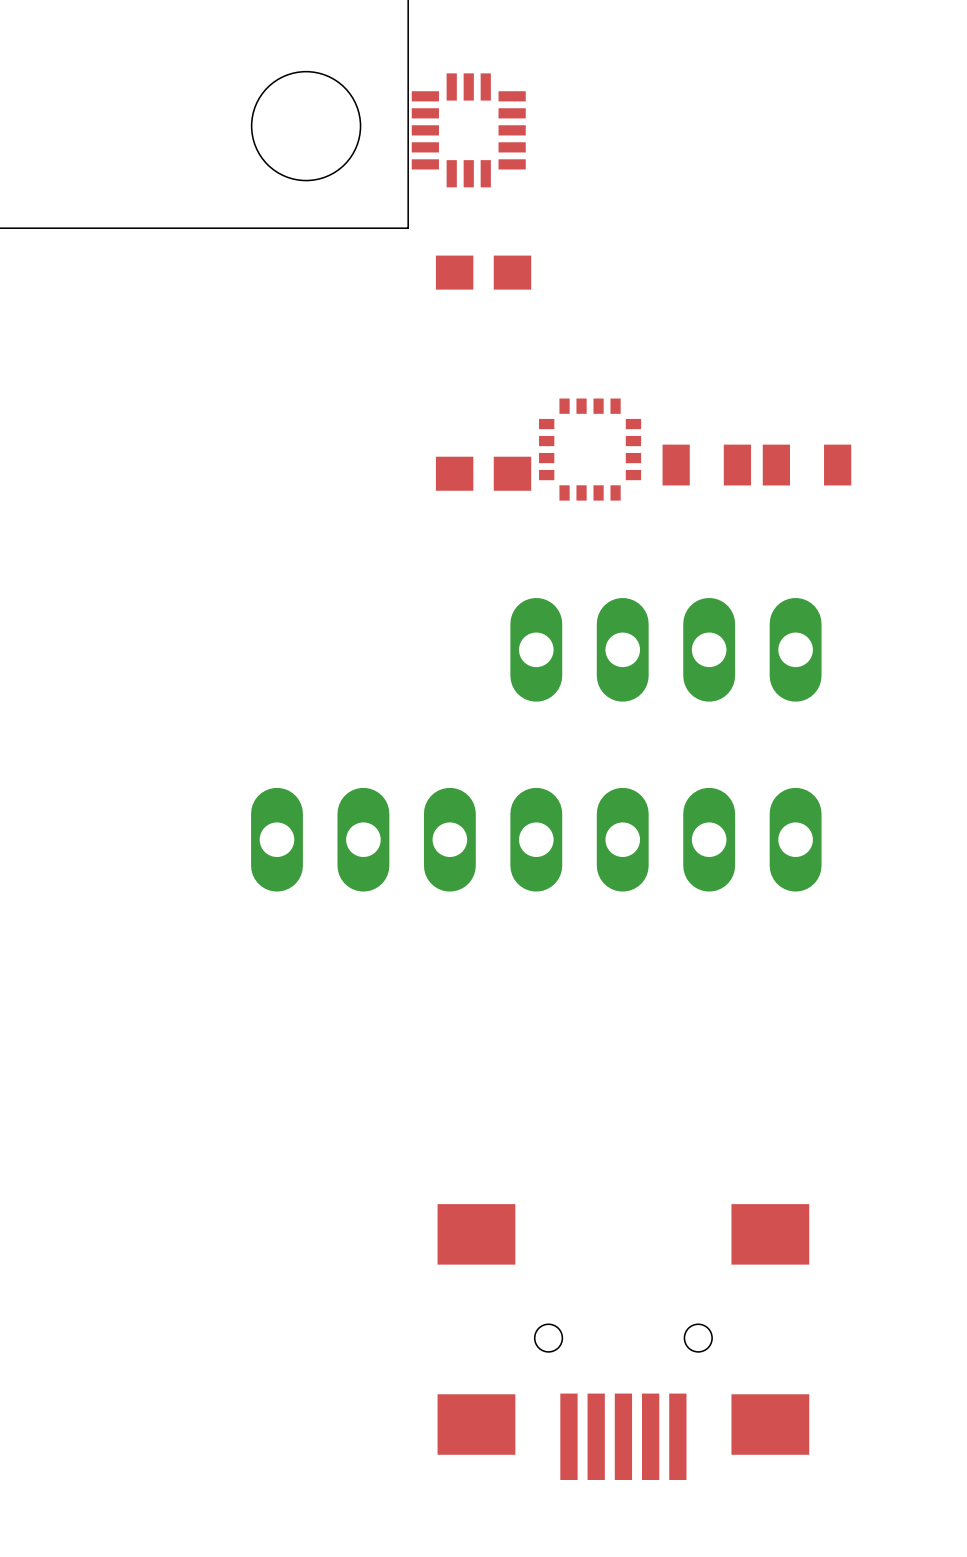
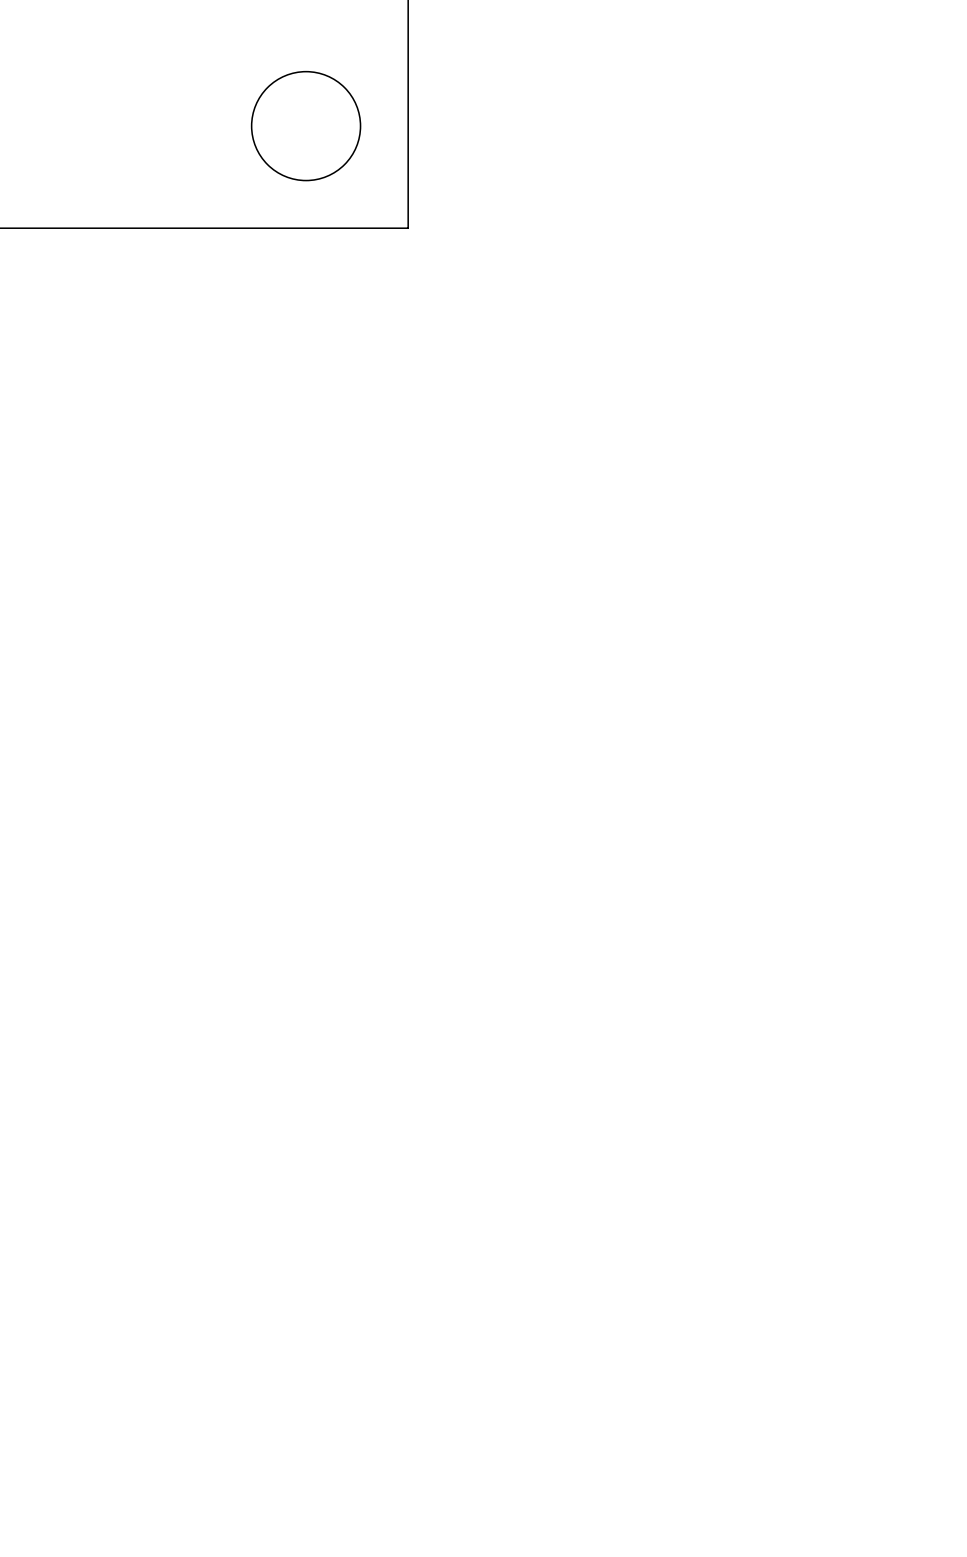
part: (468, 130) -> none
part: (483, 272) -> none
part: (590, 449) -> none
part: (706, 465) -> none
part: (807, 465) -> none
part: (483, 473) -> none
part: (665, 649) -> none
part: (536, 839) -> none
part: (623, 1342) -> none

